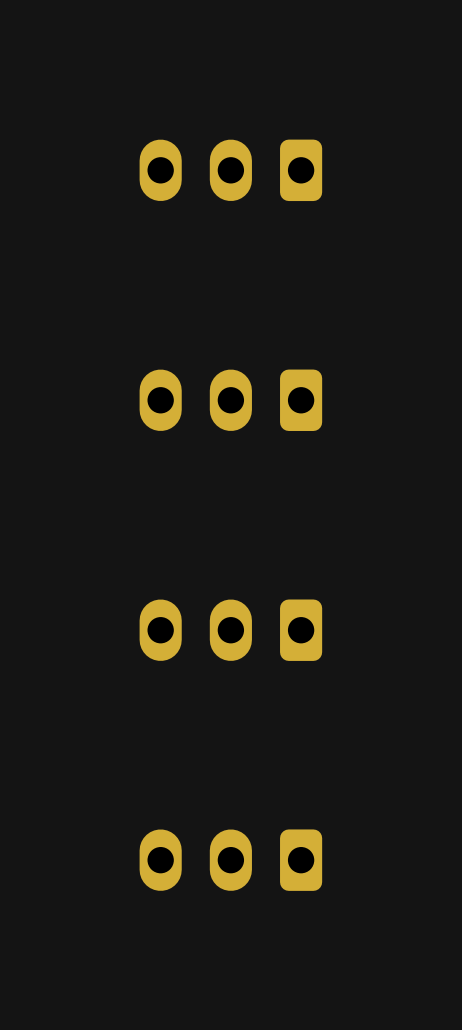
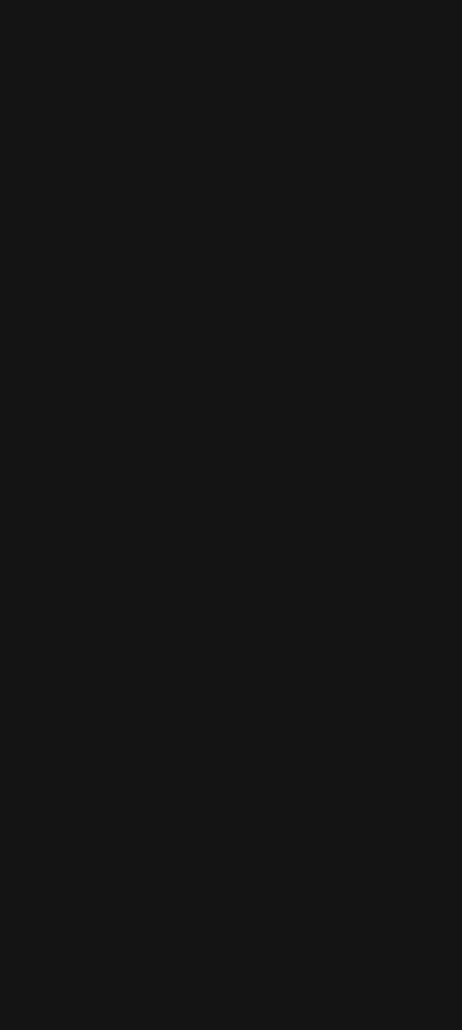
part: (230, 170) -> none
part: (230, 400) -> none
part: (230, 630) -> none
part: (230, 860) -> none

